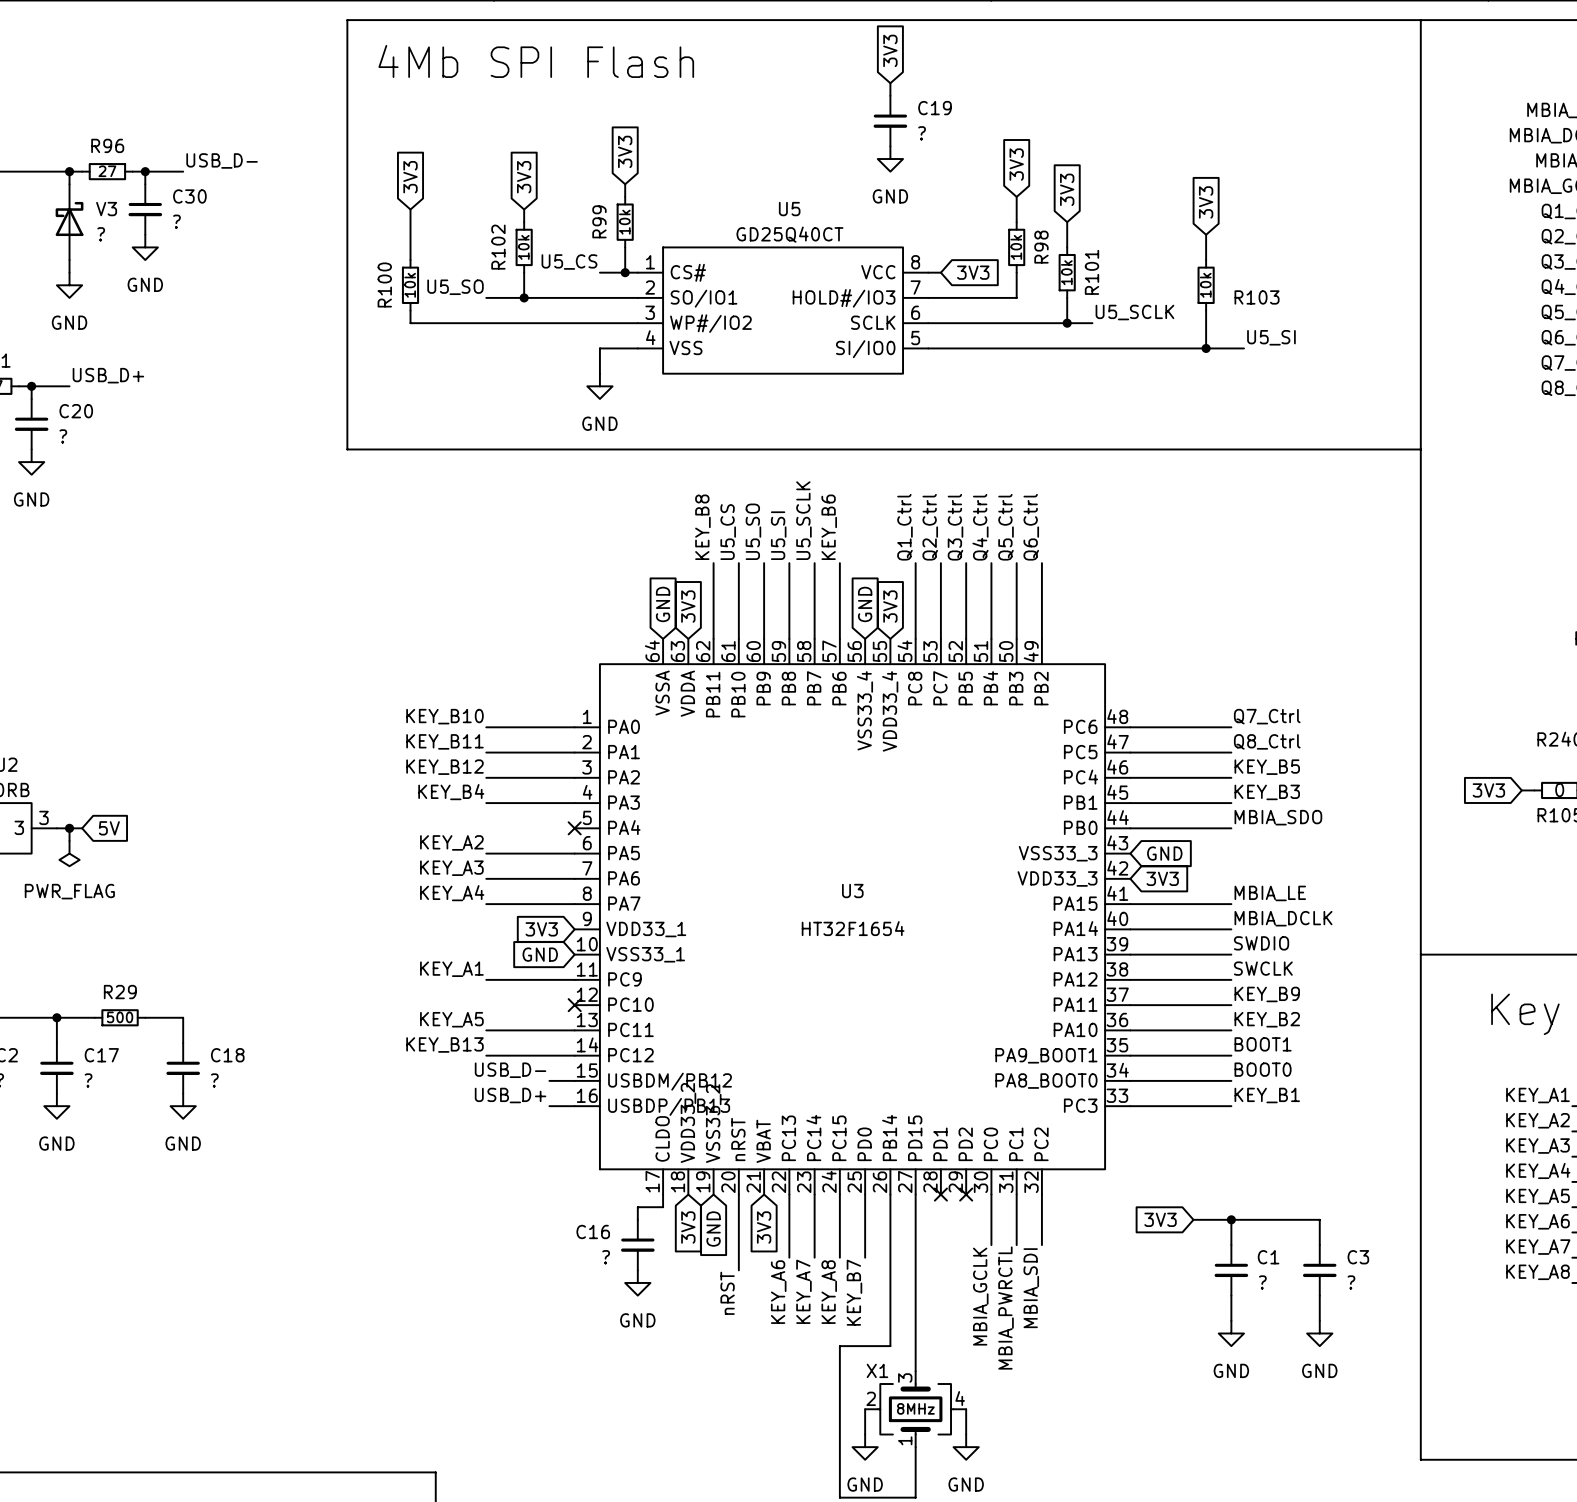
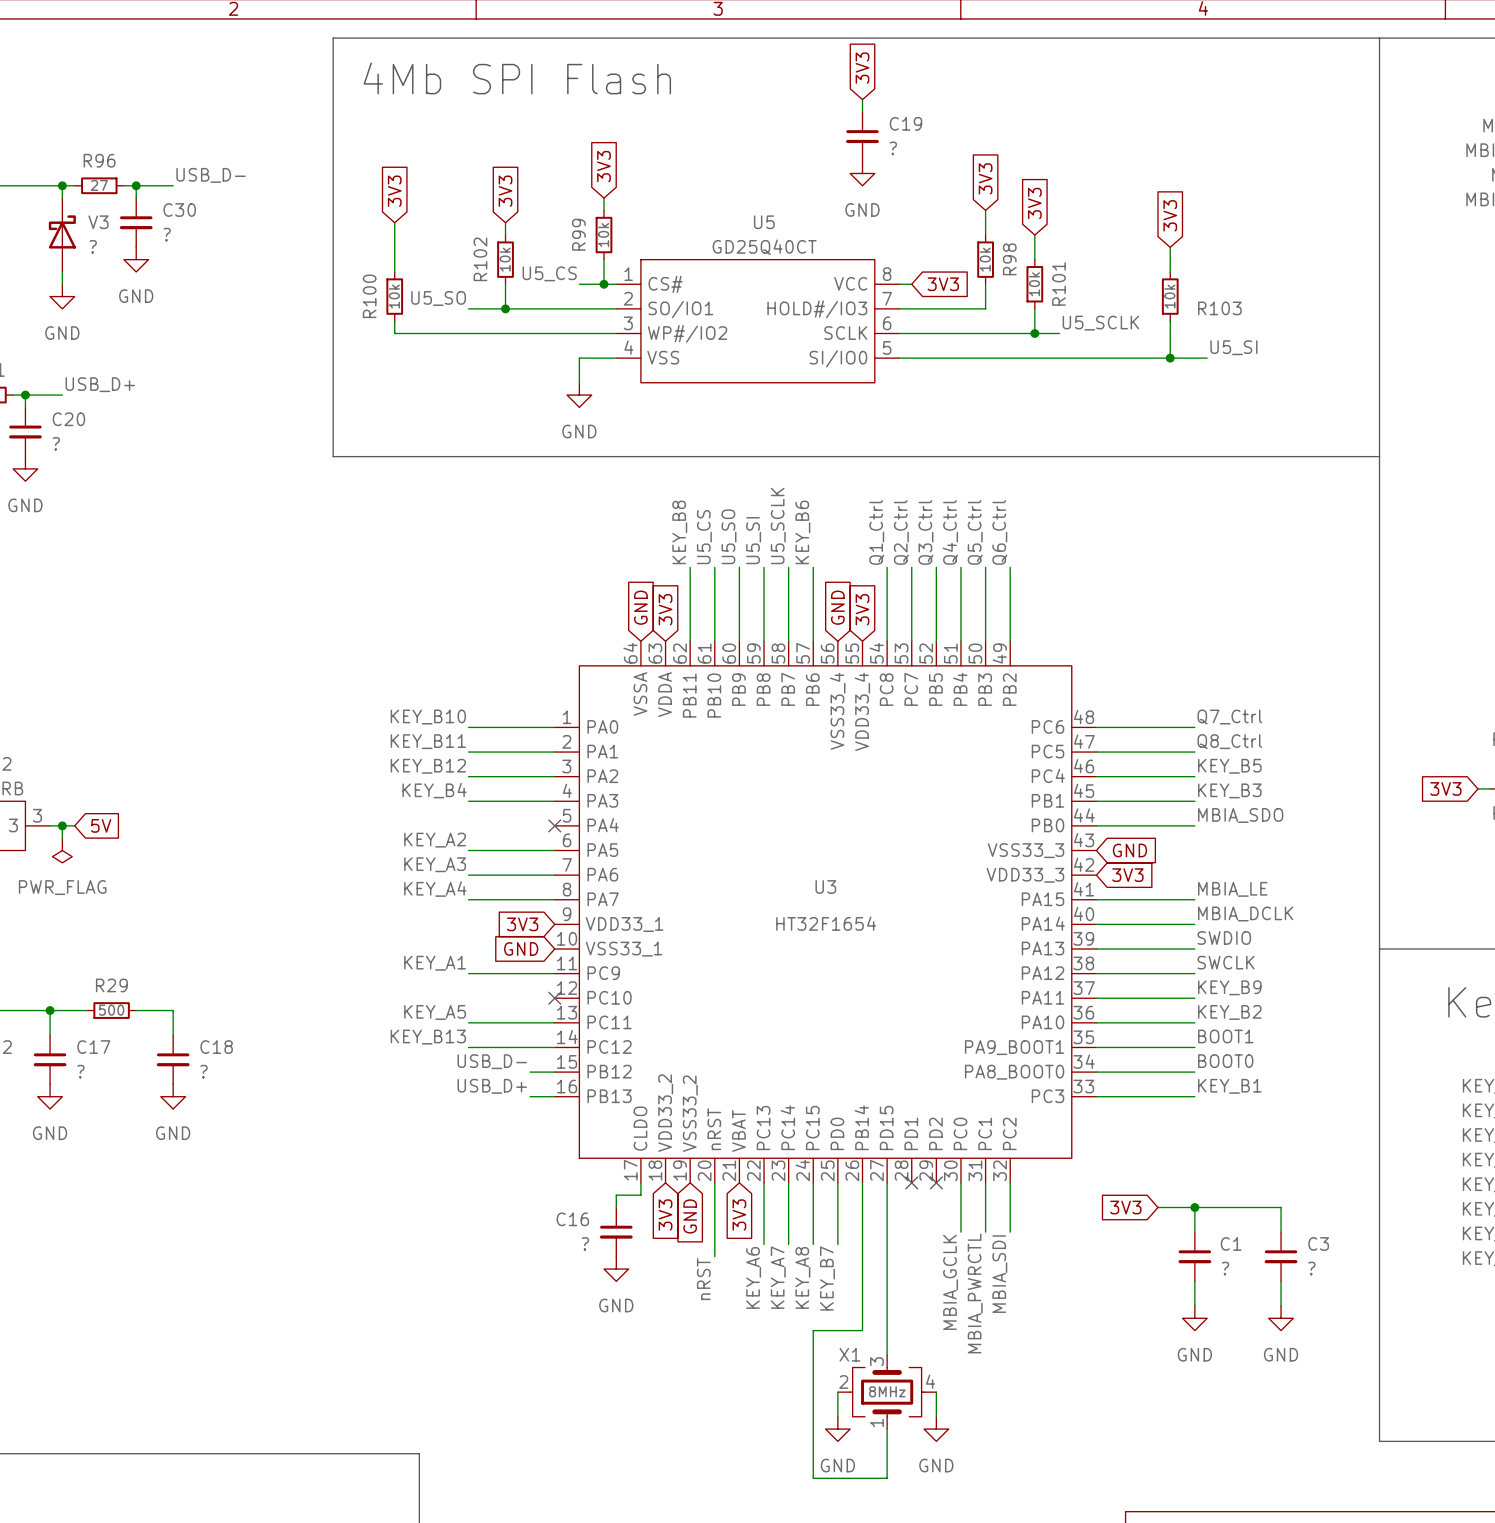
U3 pin name: USBDM/PB12 (670, 1081) -> PB12 (609, 1071)
U3 pin name: USBDP/PB13 (669, 1106) -> PB13 (609, 1096)

